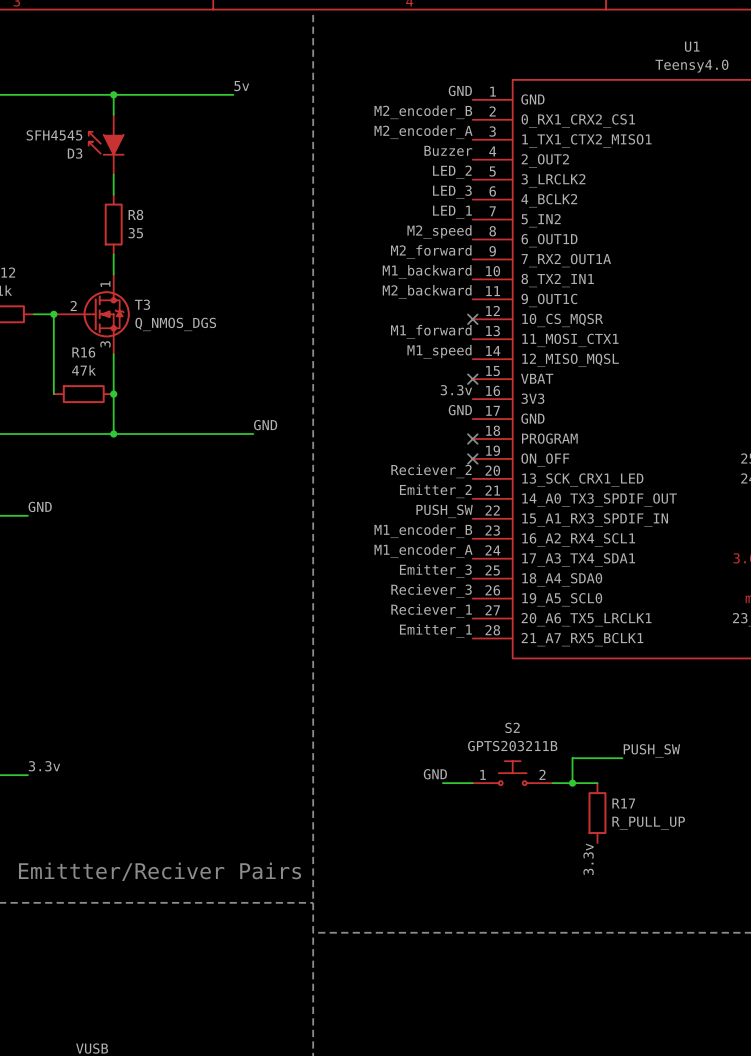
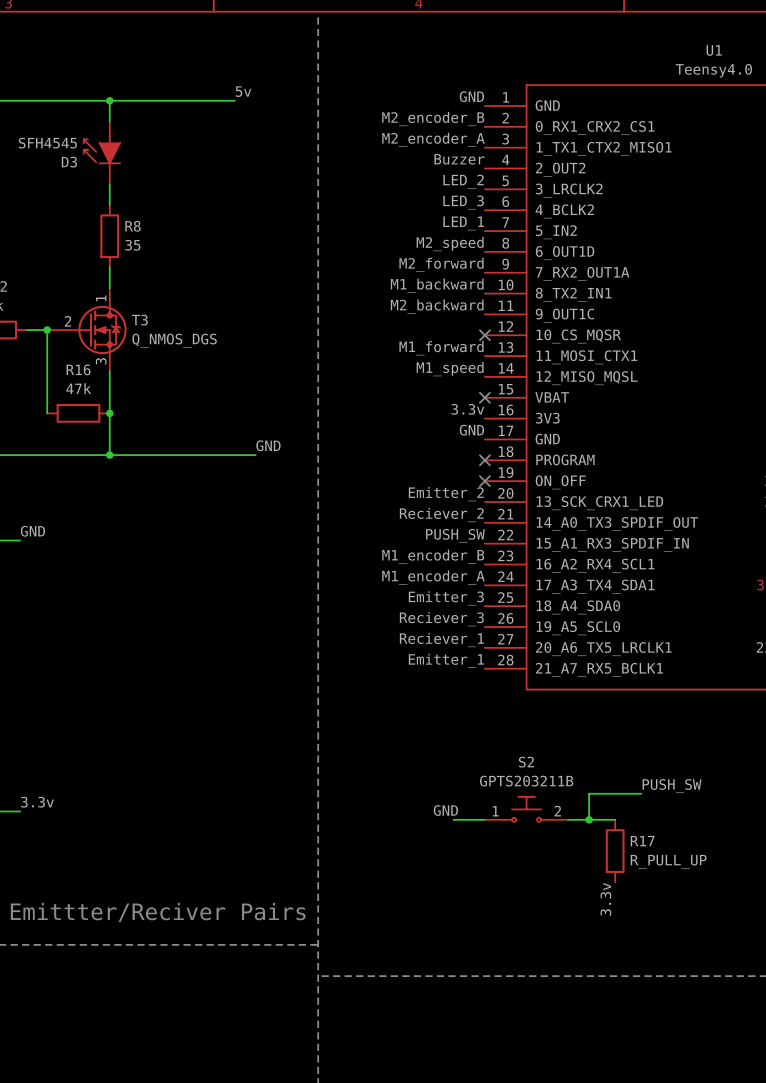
label: Reciever_2 (431, 471) -> Emitter_2 (446, 494)
label: Emitter_2 (435, 491) -> Reciever_2 (441, 514)

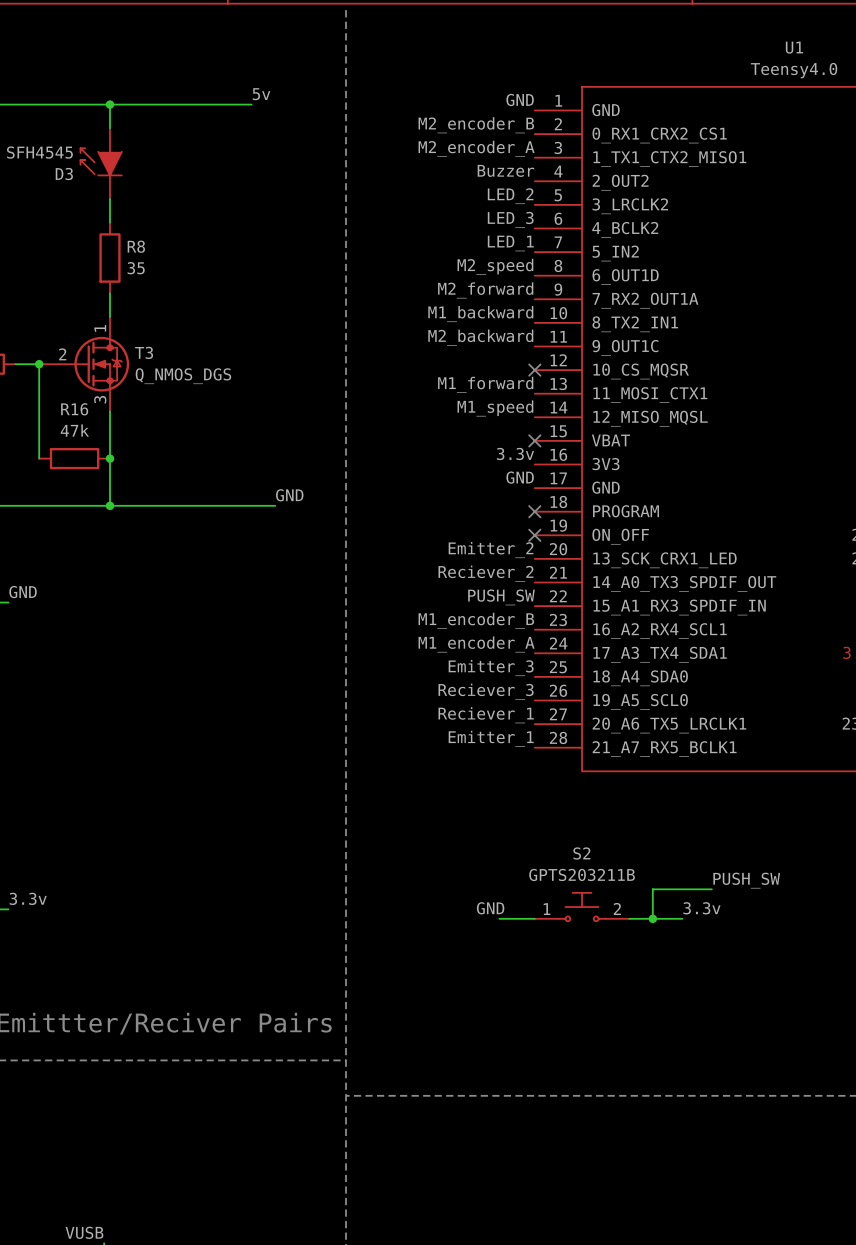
R17: R_PULL_UP (615, 851) -> none
label rotation: 0° (605, 899) -> 90° clockwise (701, 908)
label position: 3.3v (605, 899) -> 3.3v (701, 908)

